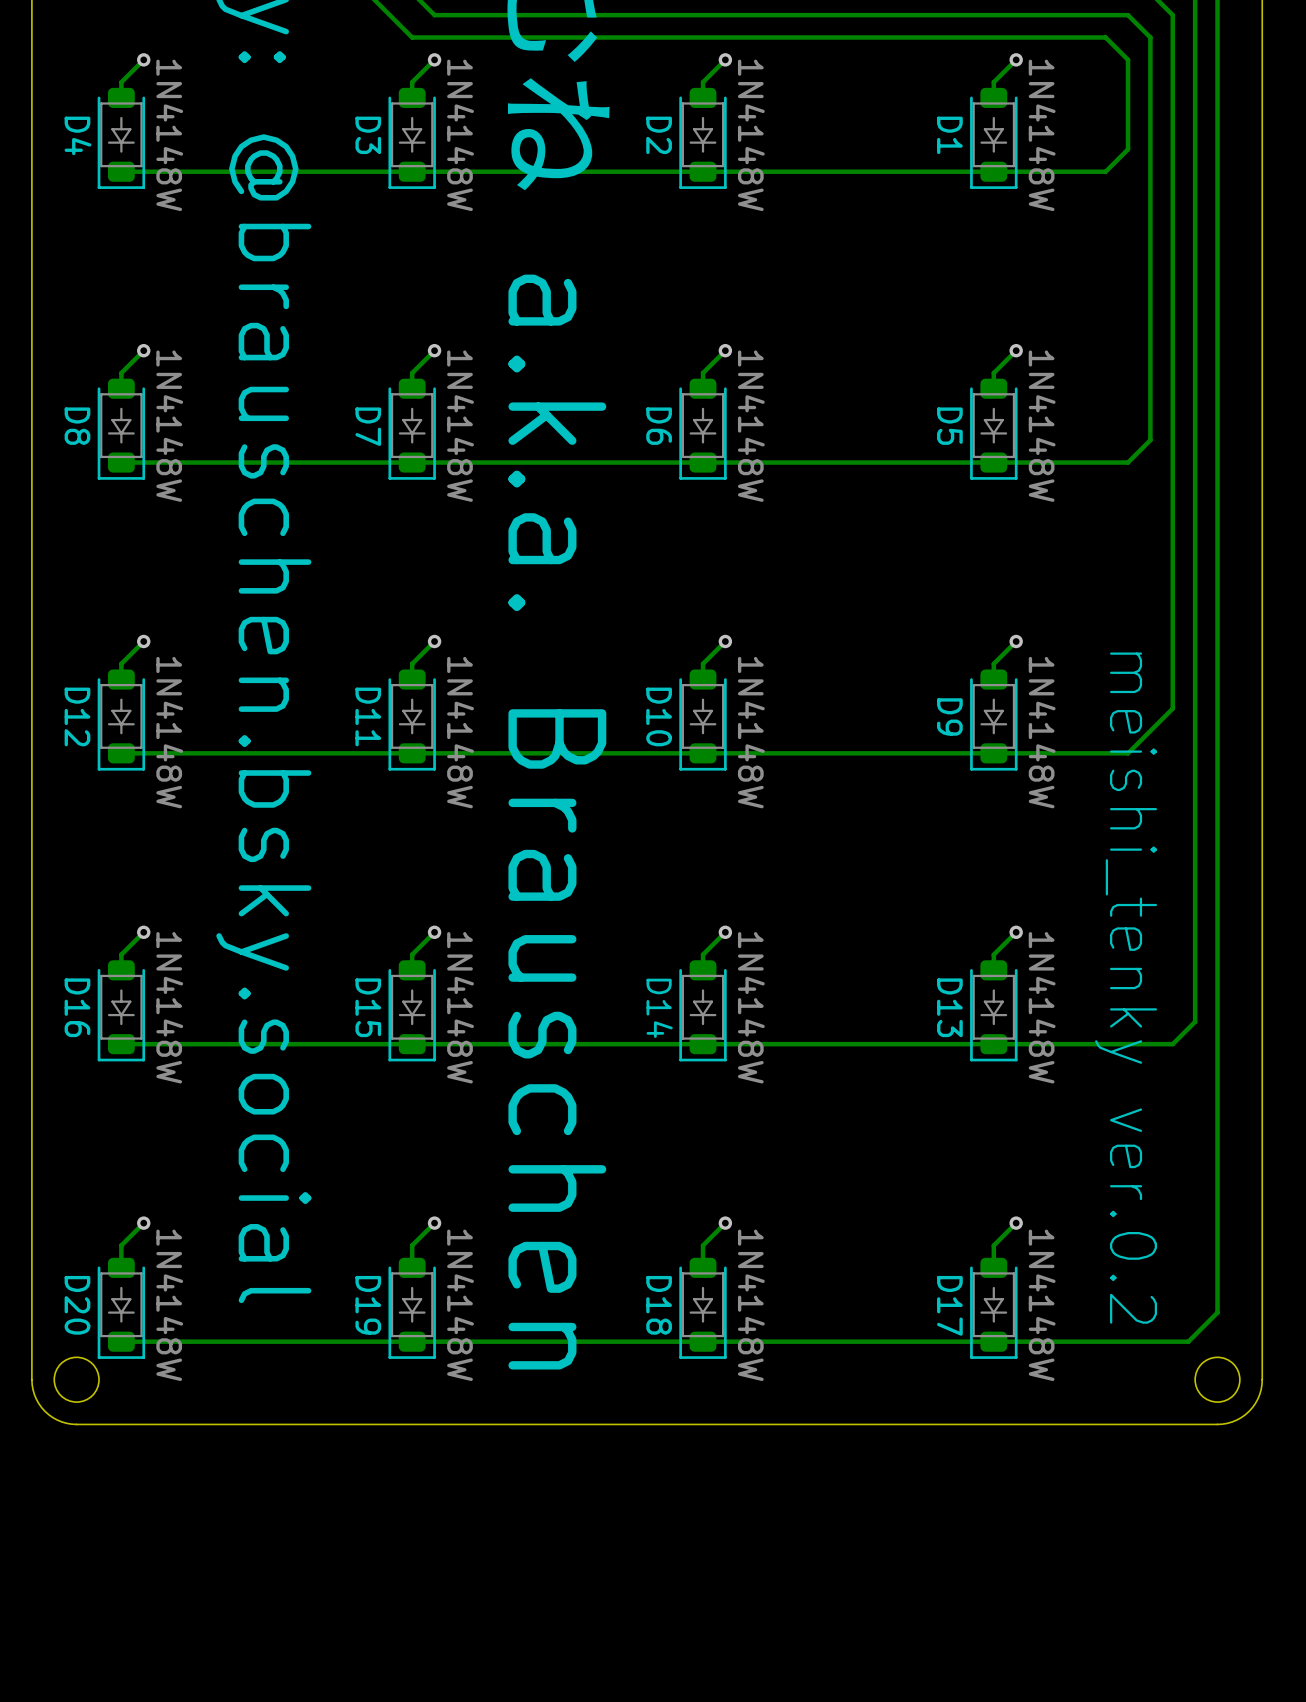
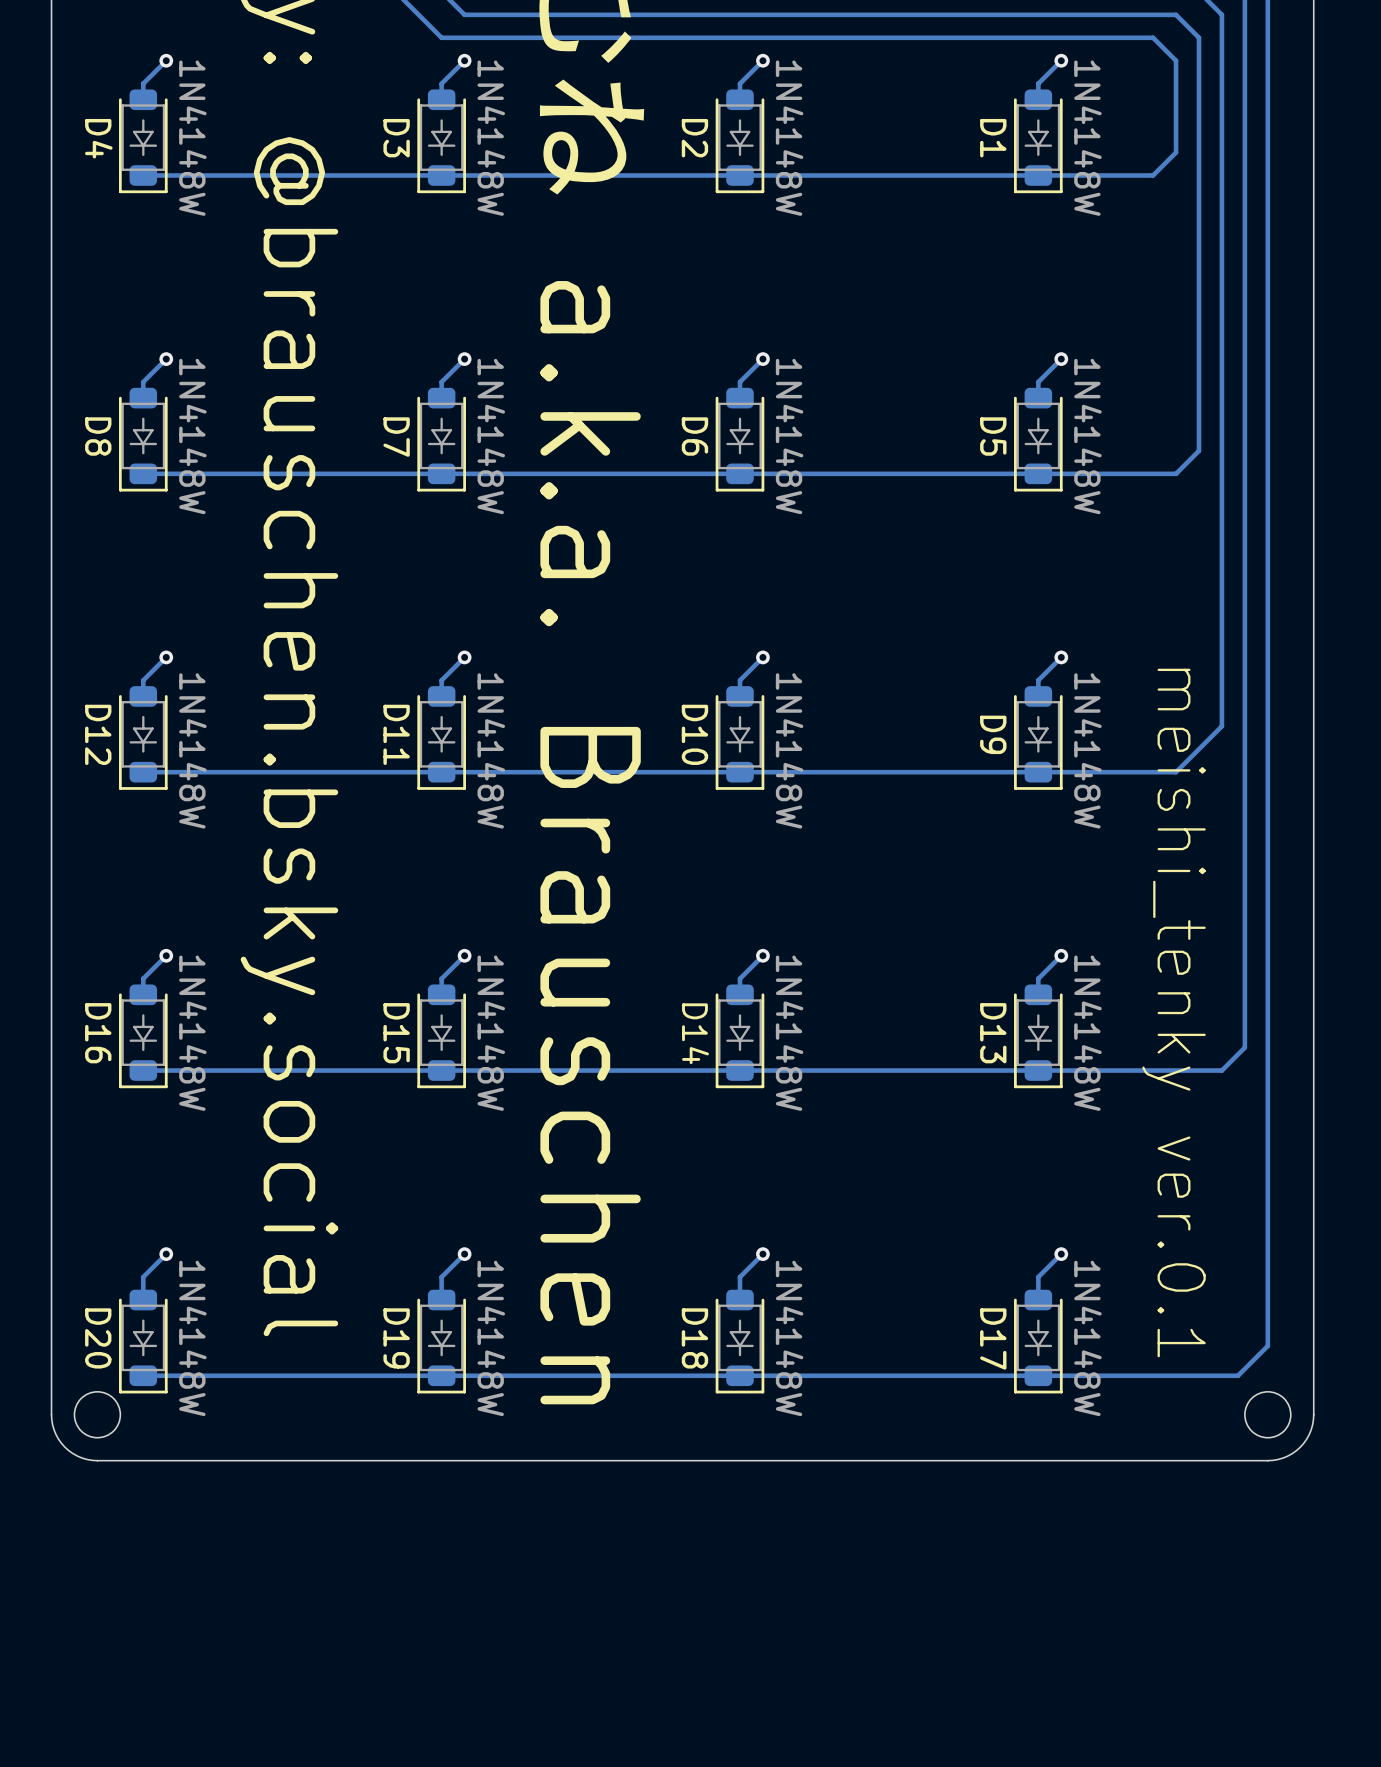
text: meishi_tenky ver.0.2 (1126, 988) -> meishi_tenky ver.0.1 (1174, 1013)

